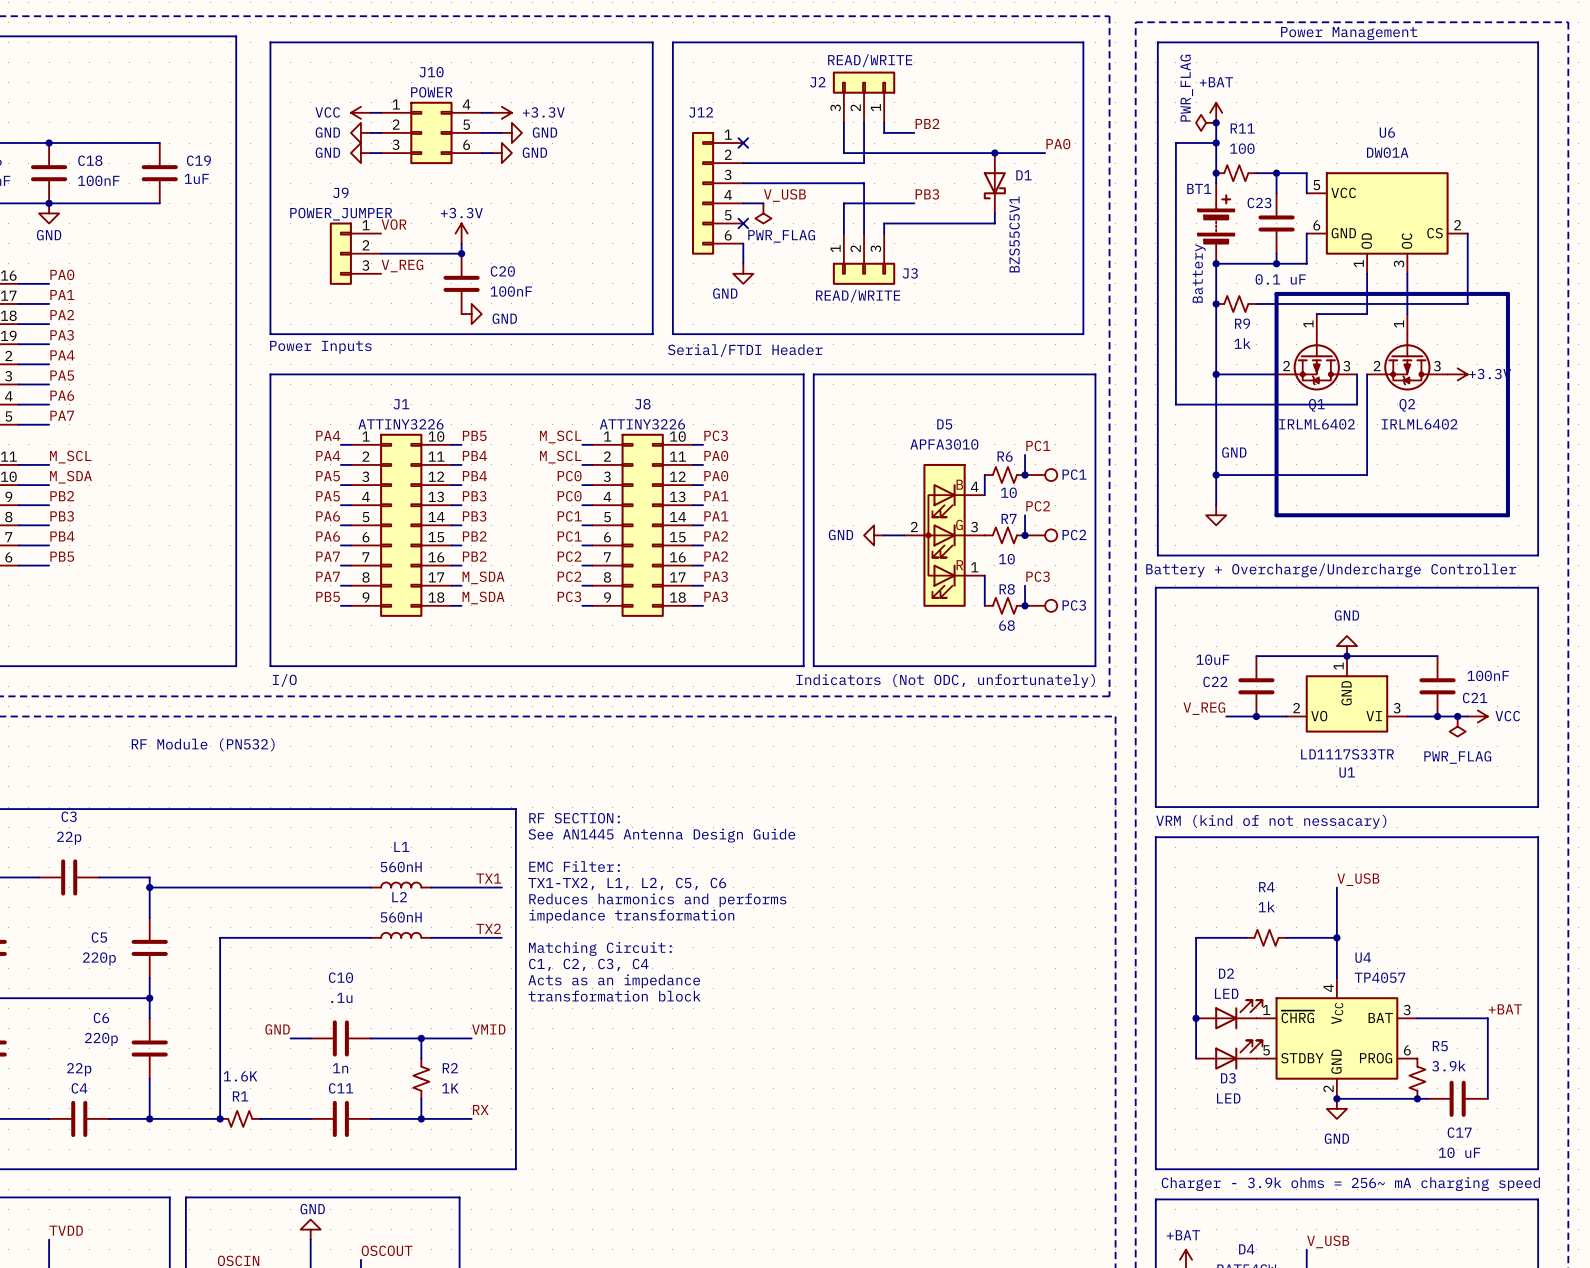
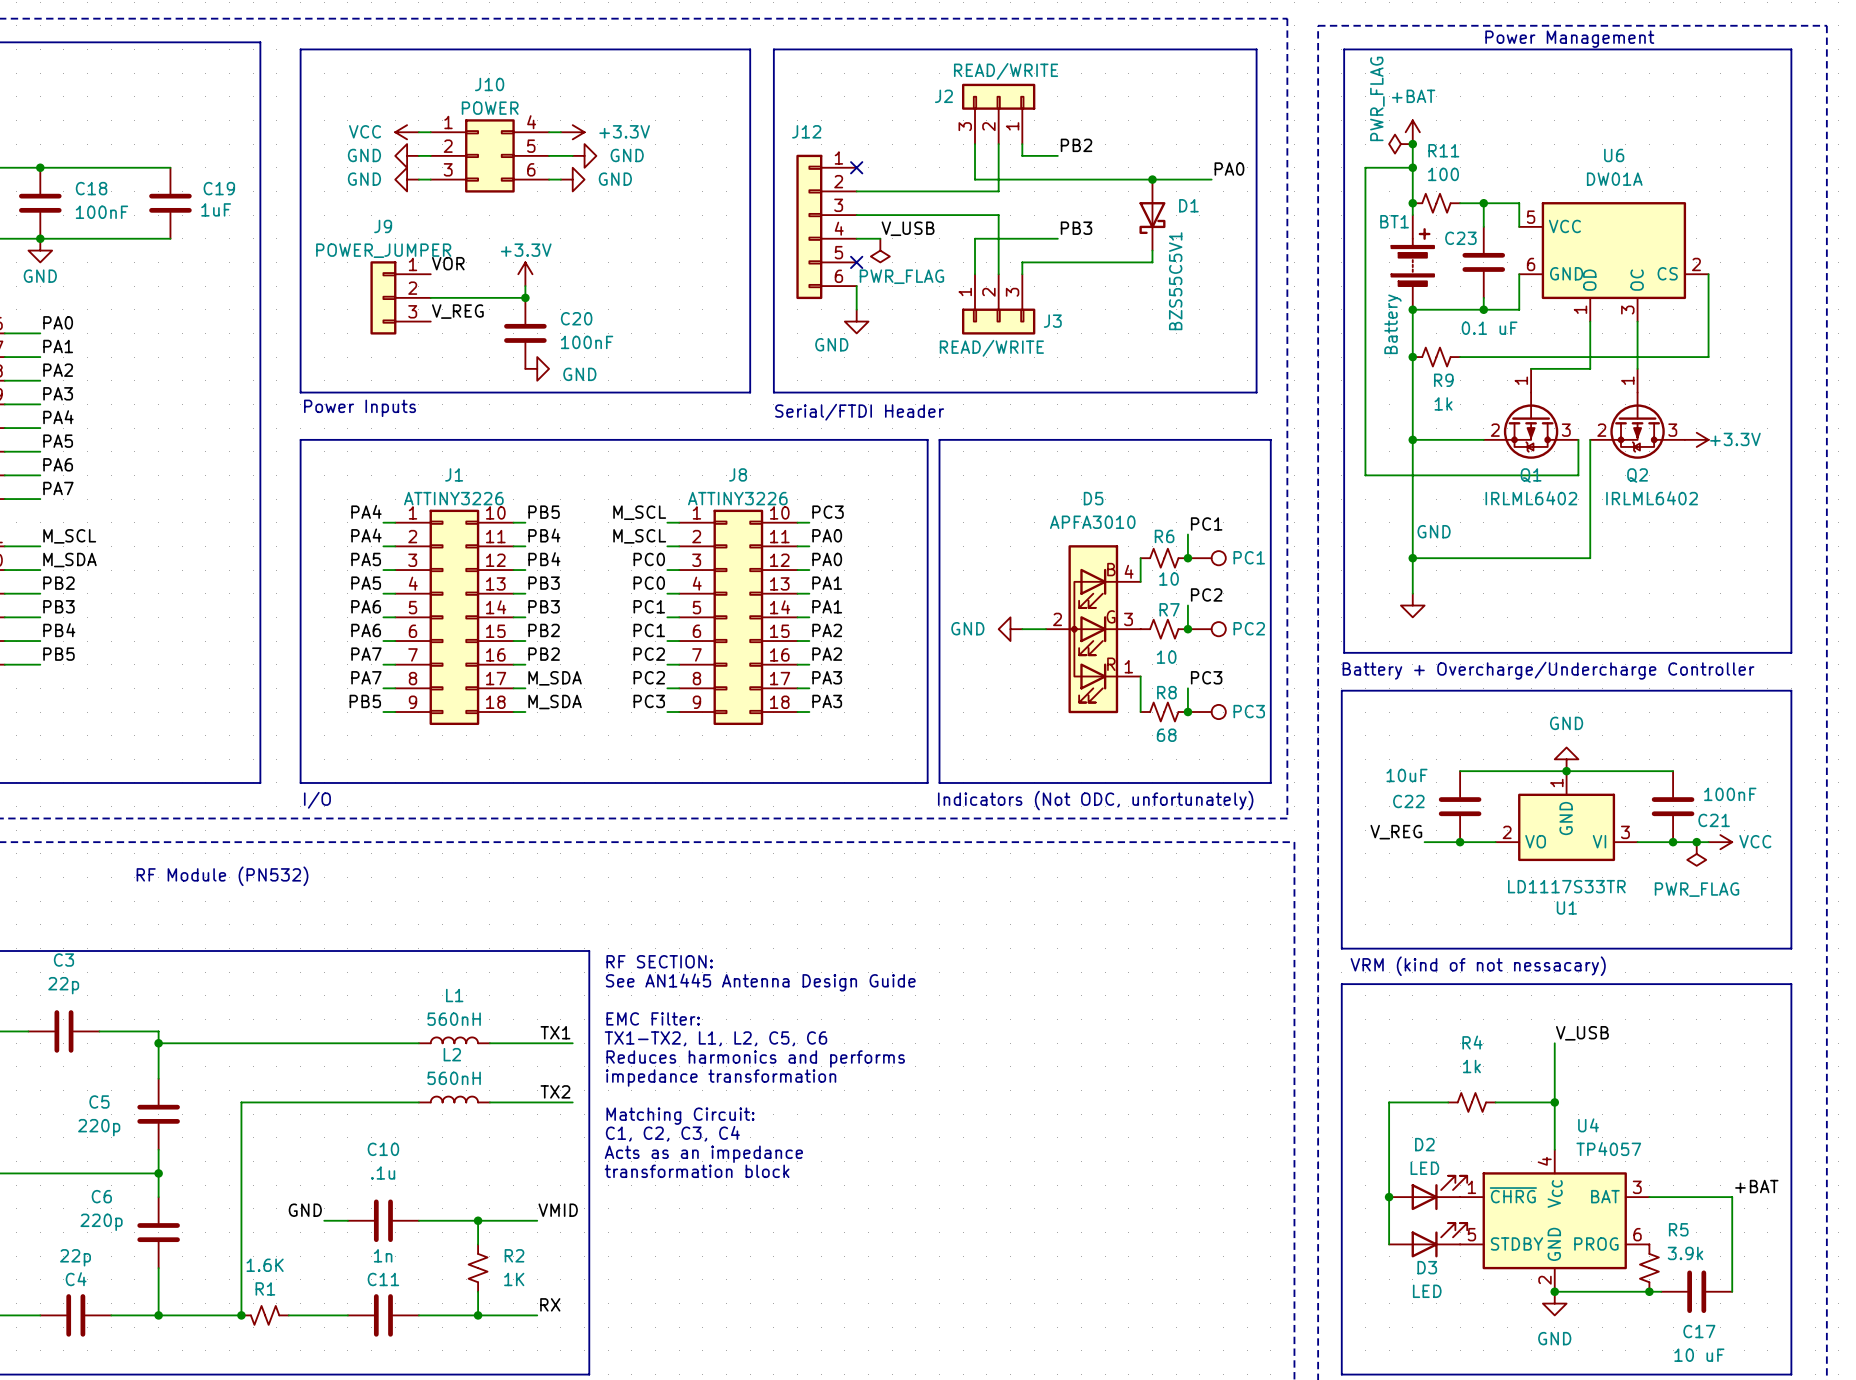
line: (1276, 293) (1507, 293) (1507, 515) (1276, 515) (1276, 293) -> none

